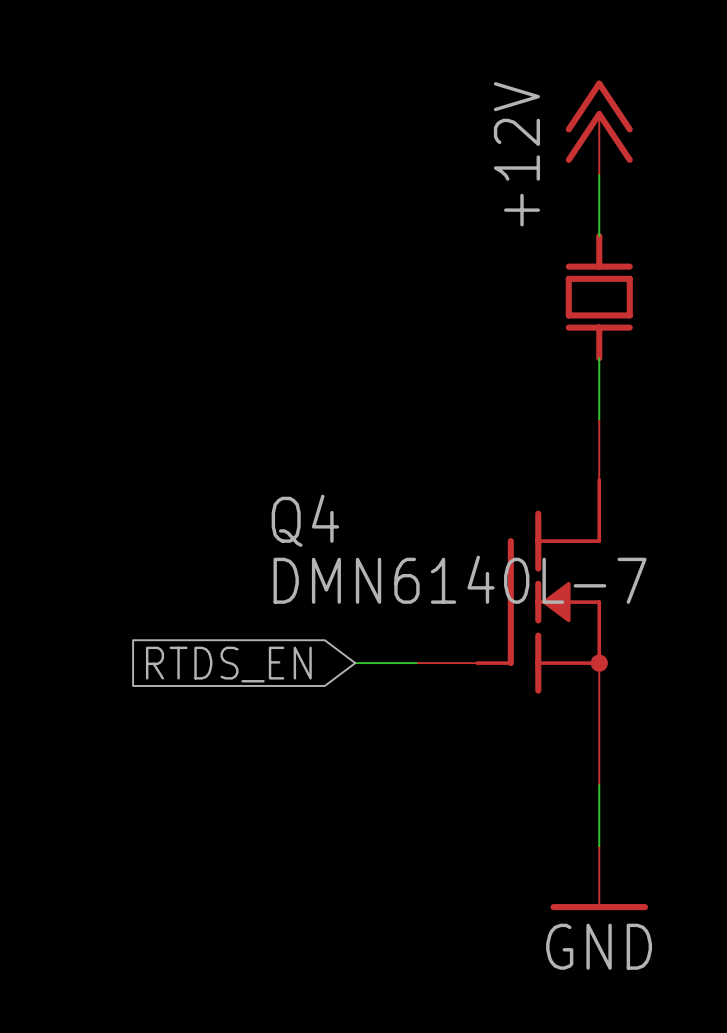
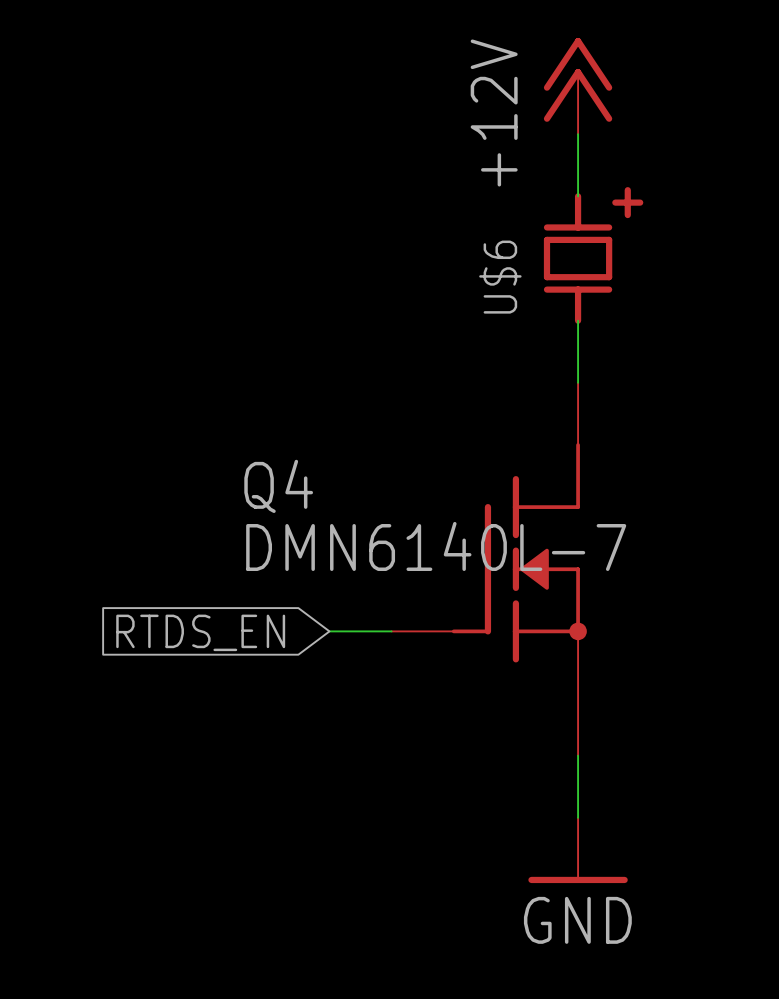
U$6: none -> (593, 255)

